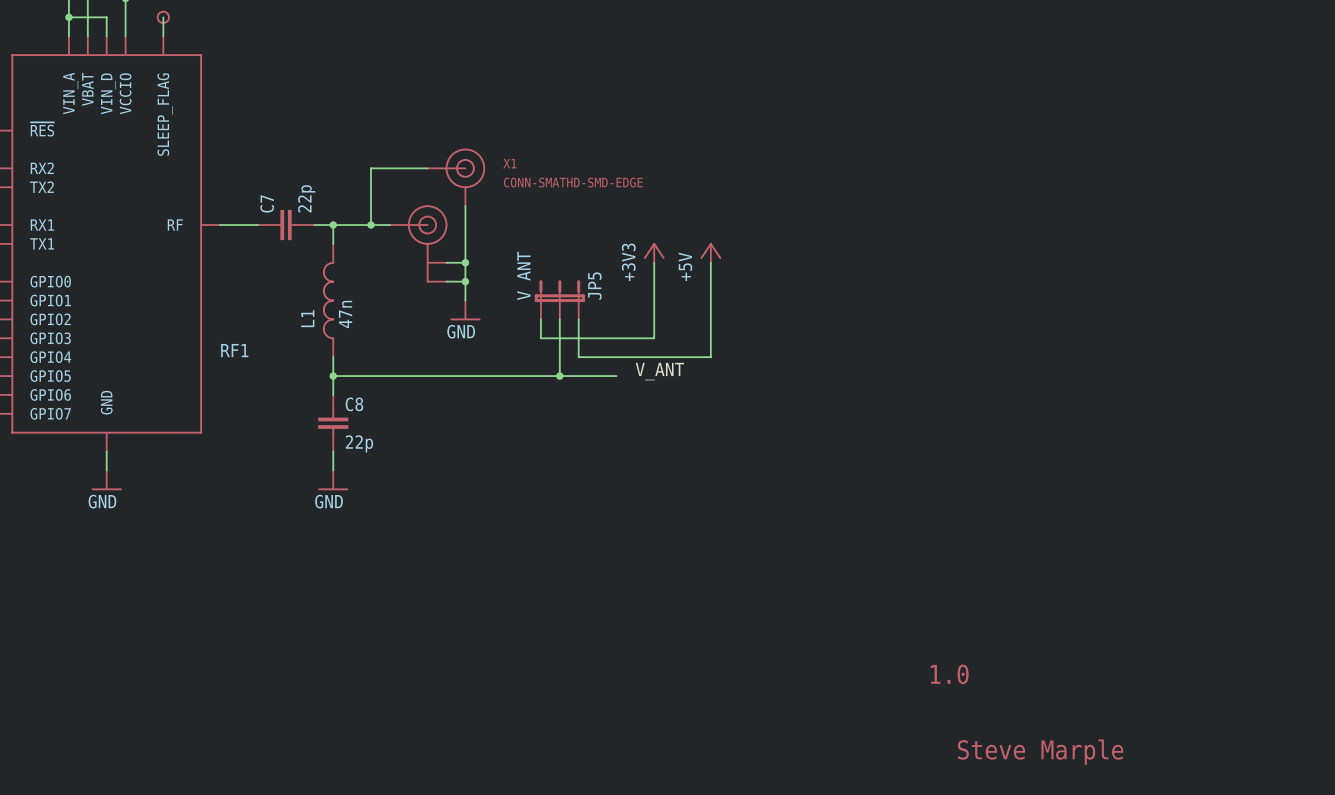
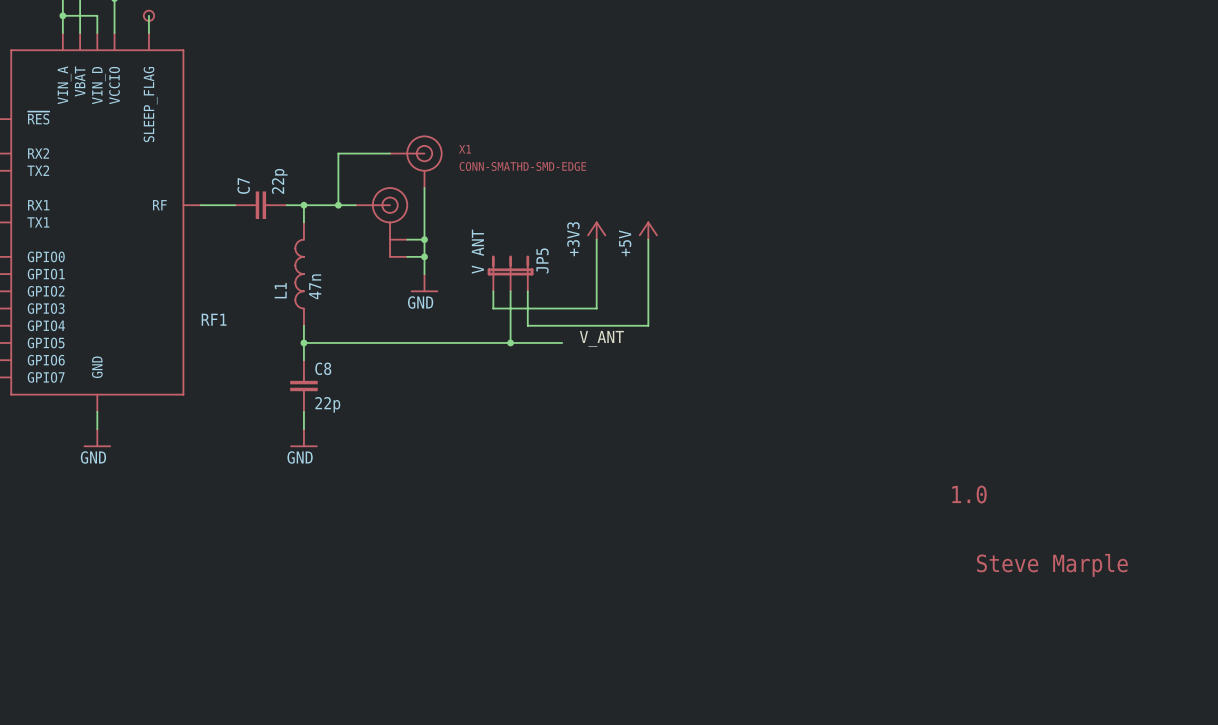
text position: 1.0 (949, 674) -> 1.0 (969, 494)
text position: Steve Marple (1040, 752) -> Steve Marple (1052, 565)

